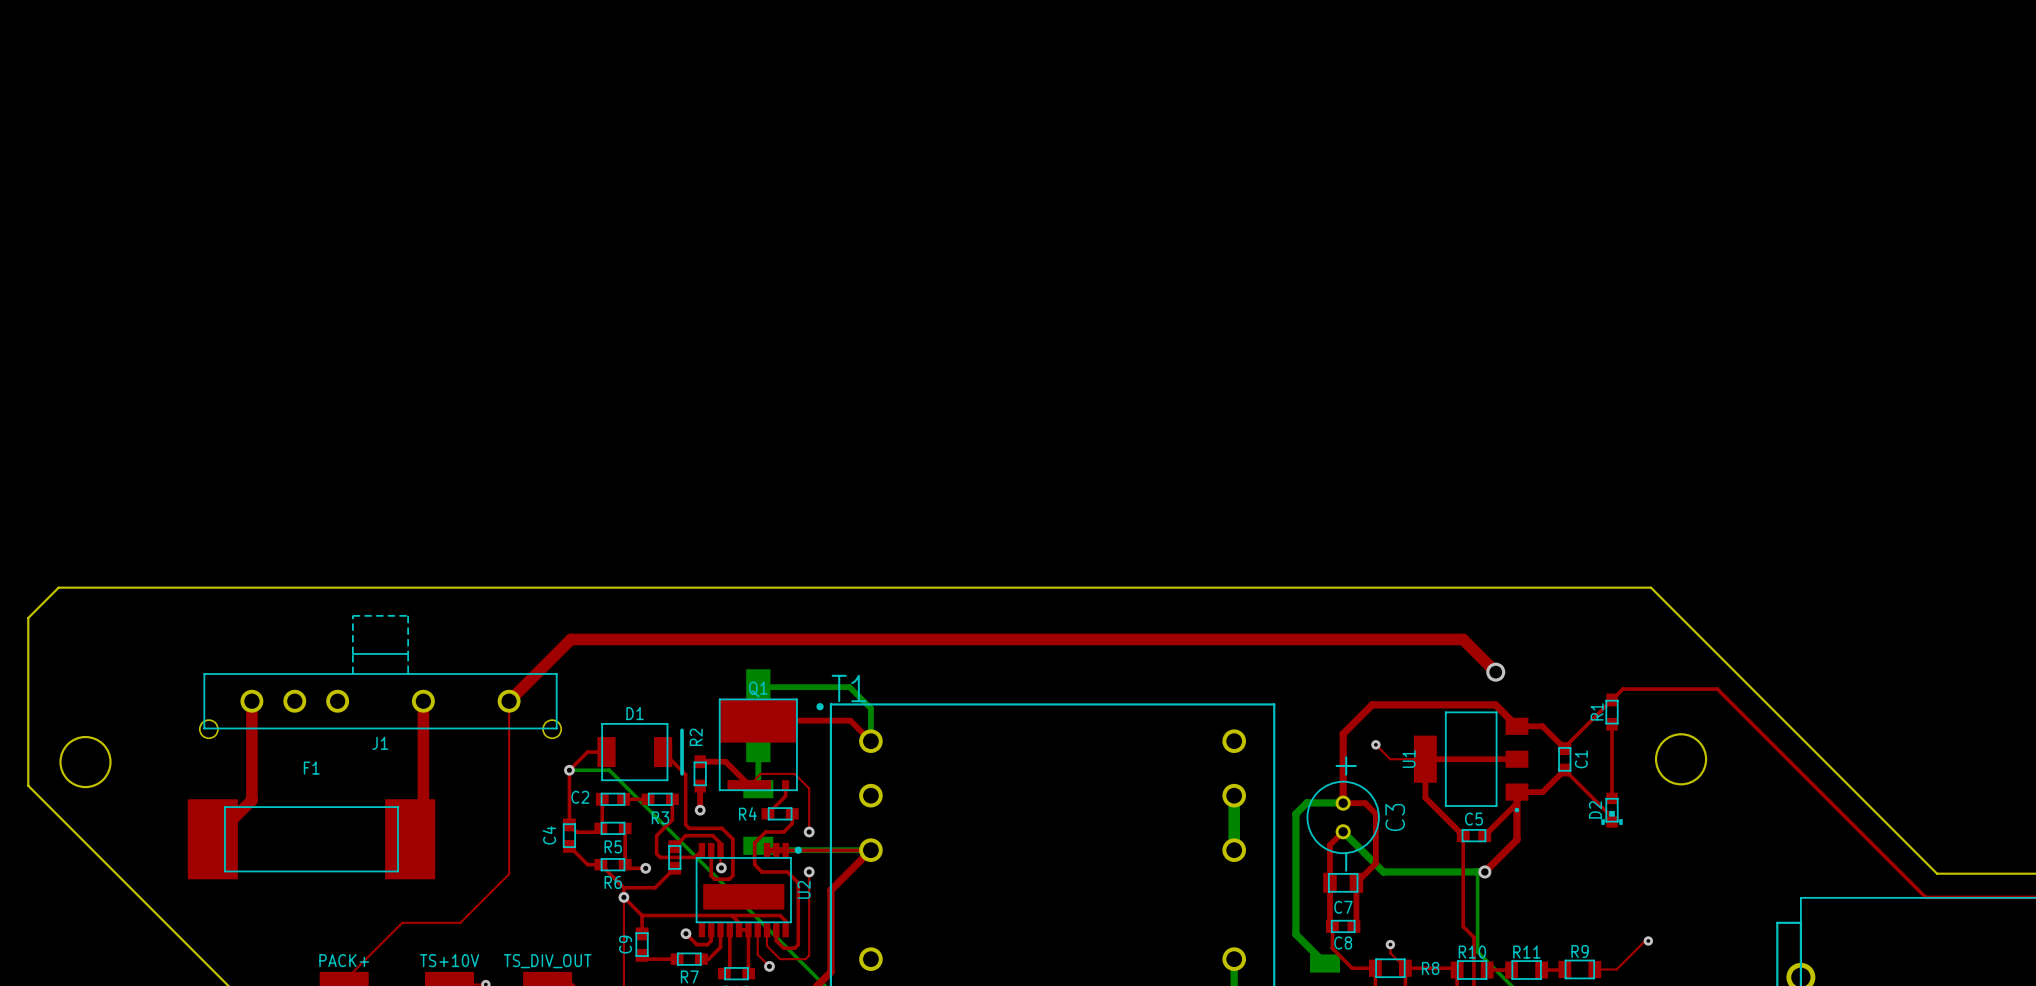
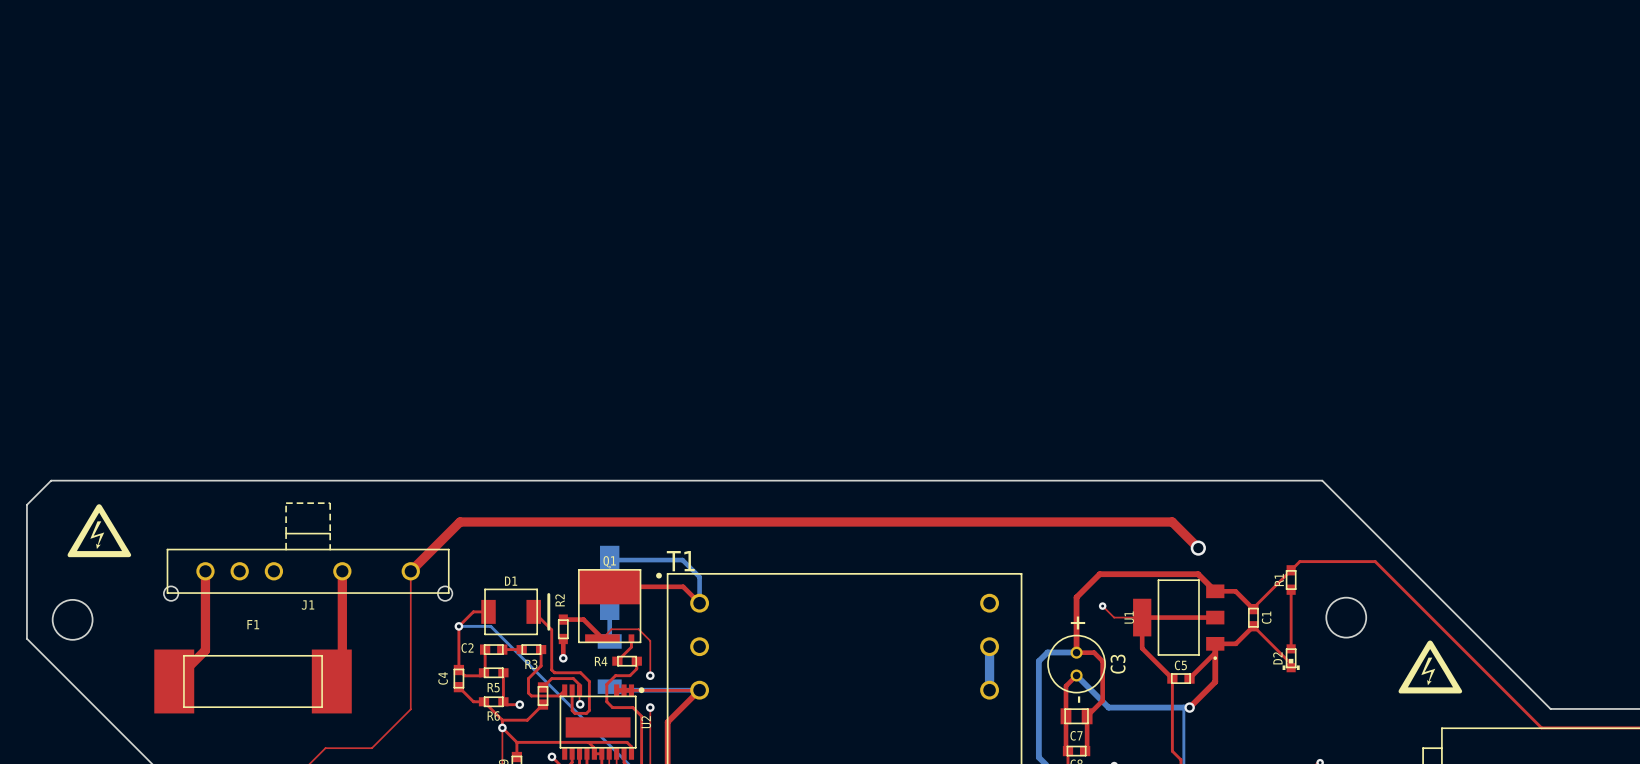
drawing: none -> [67, 504, 132, 558]
drawing: none -> [1398, 640, 1463, 694]

